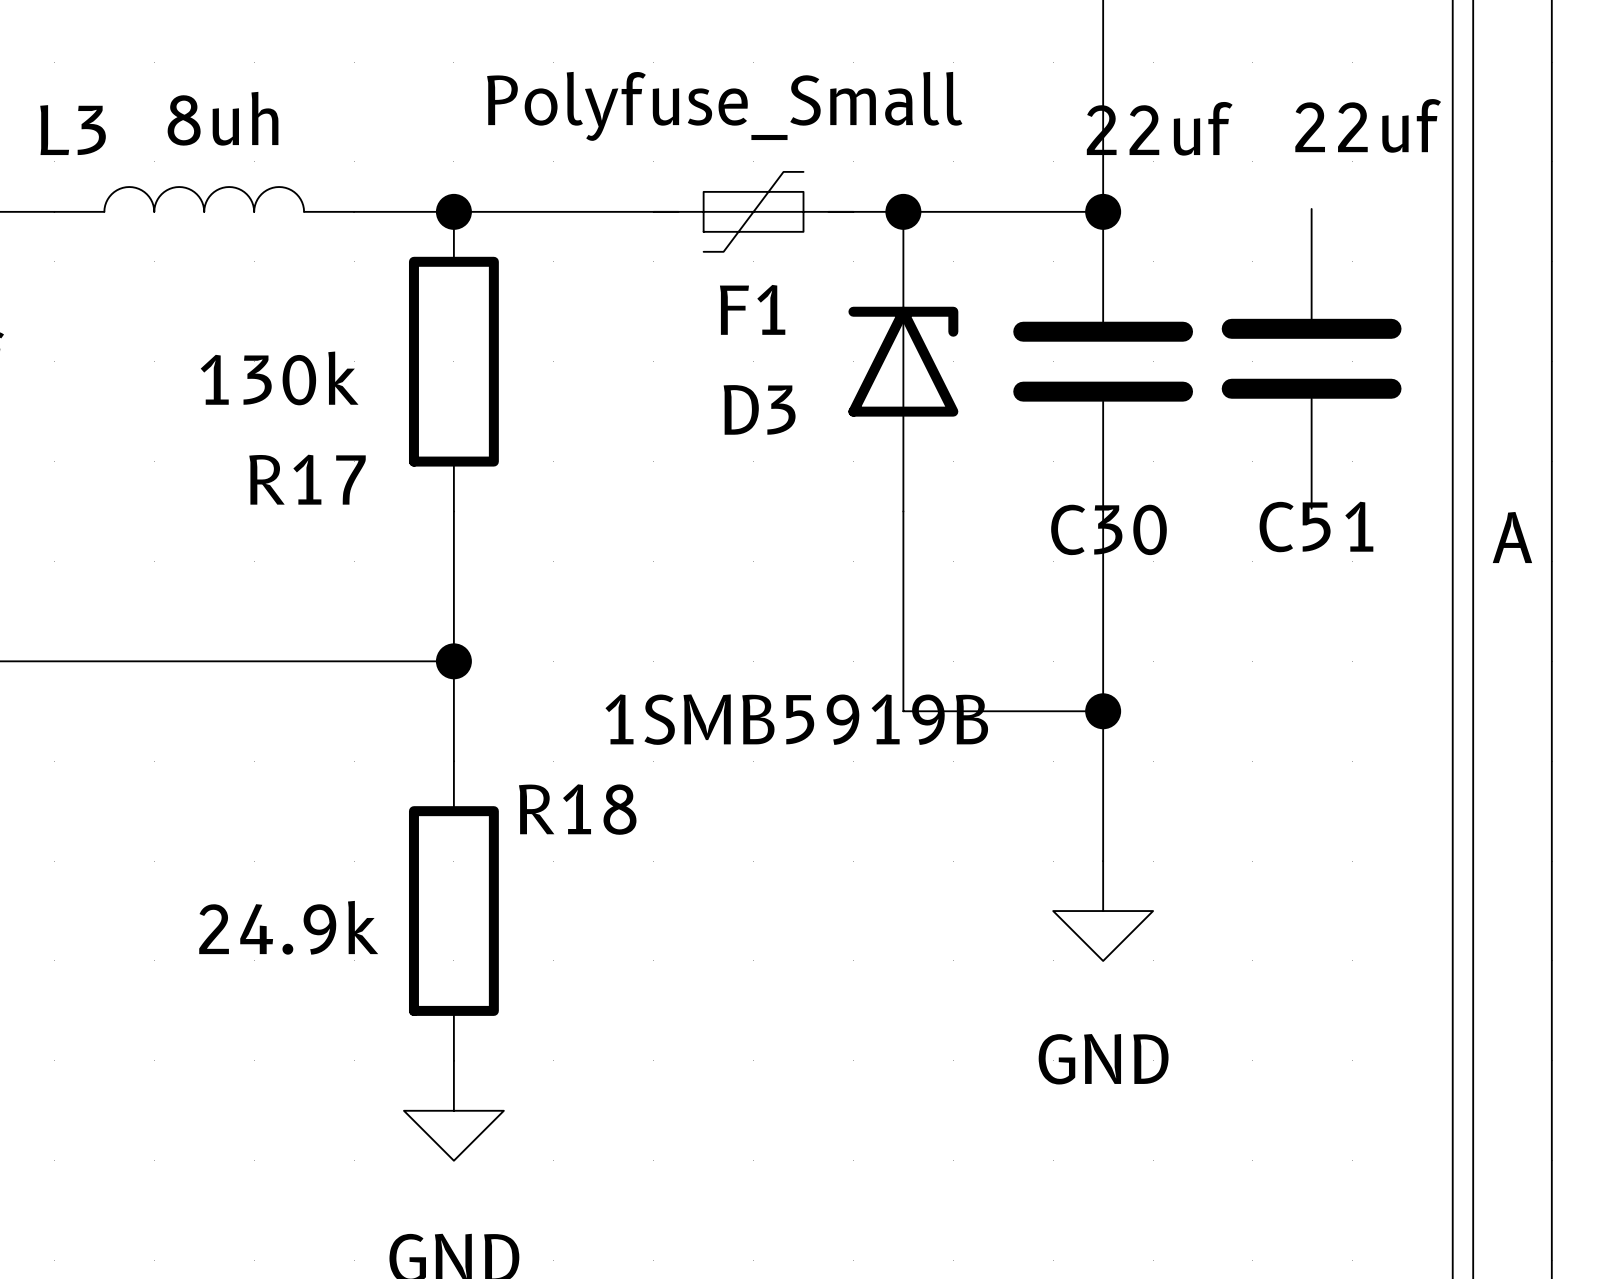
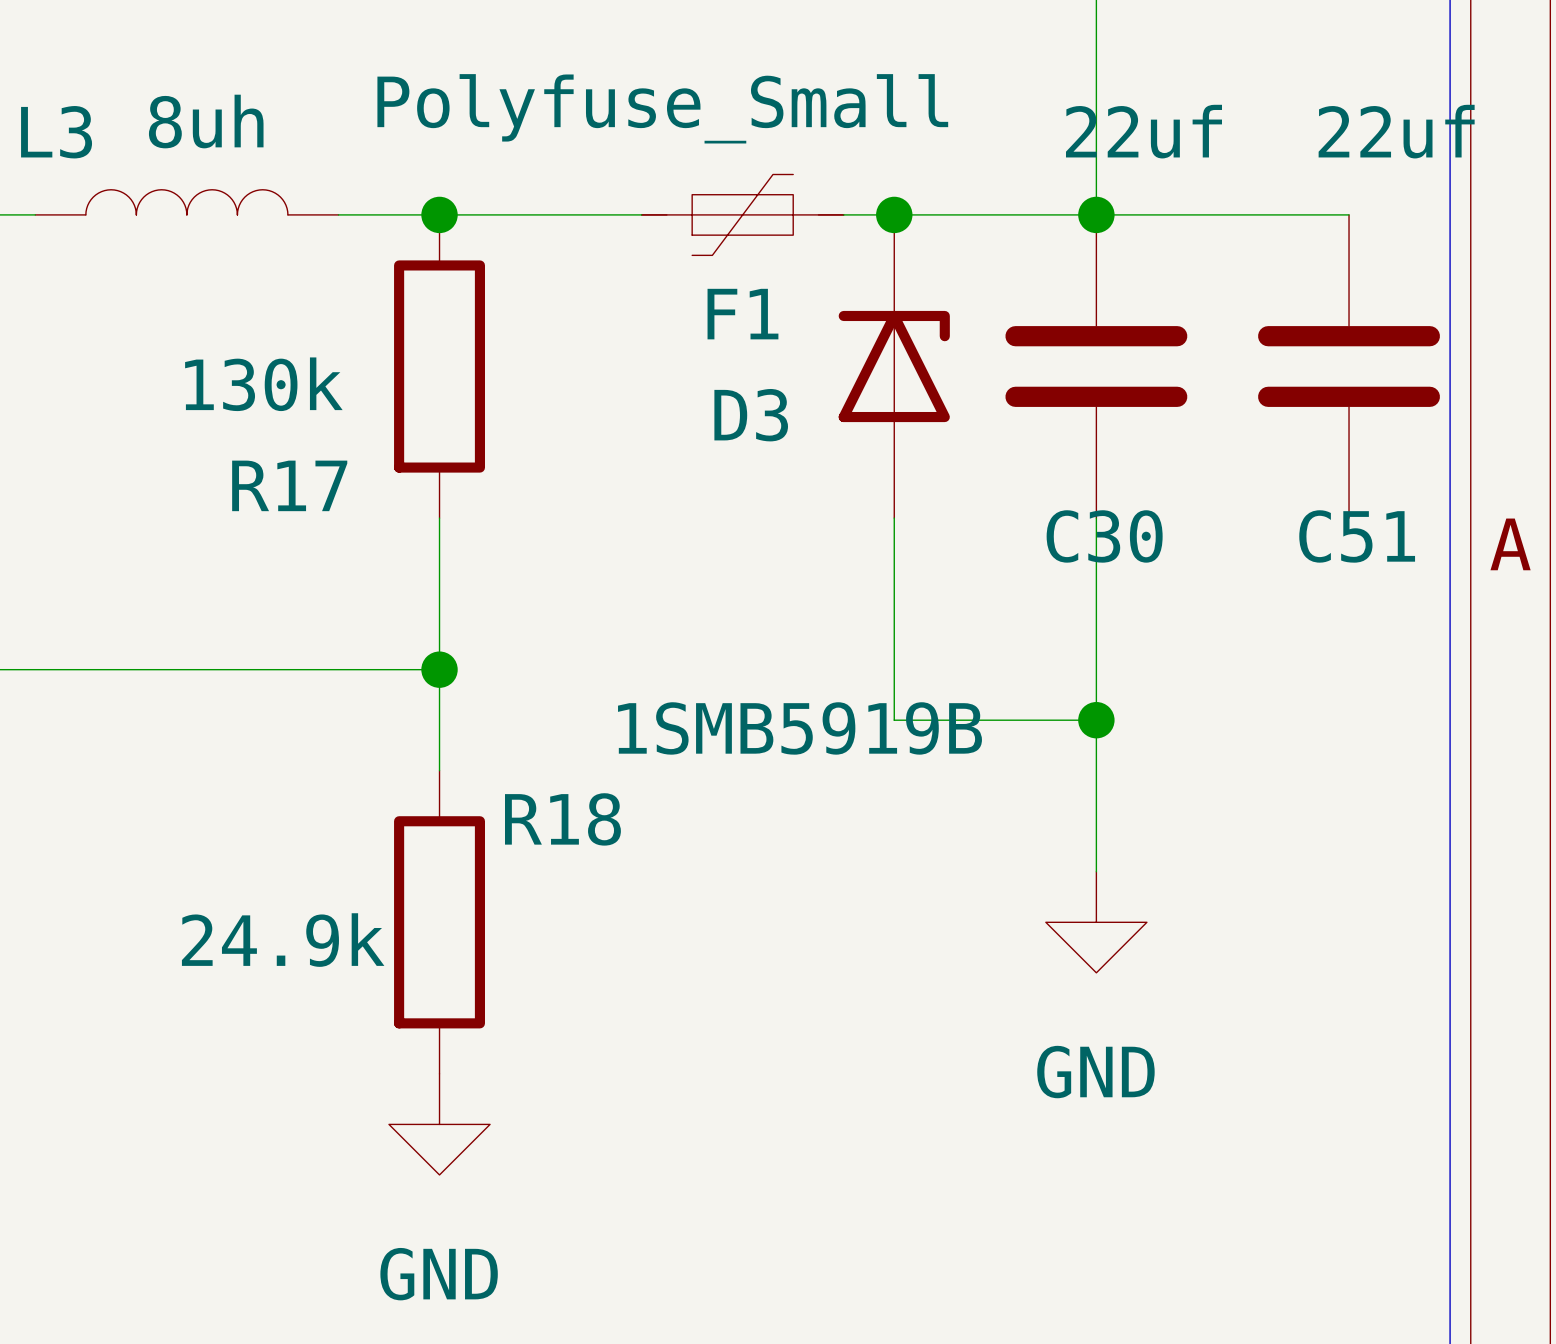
wire: none -> (1096, 214) (1349, 214)
C51 position: (1311, 358) -> (1349, 366)

